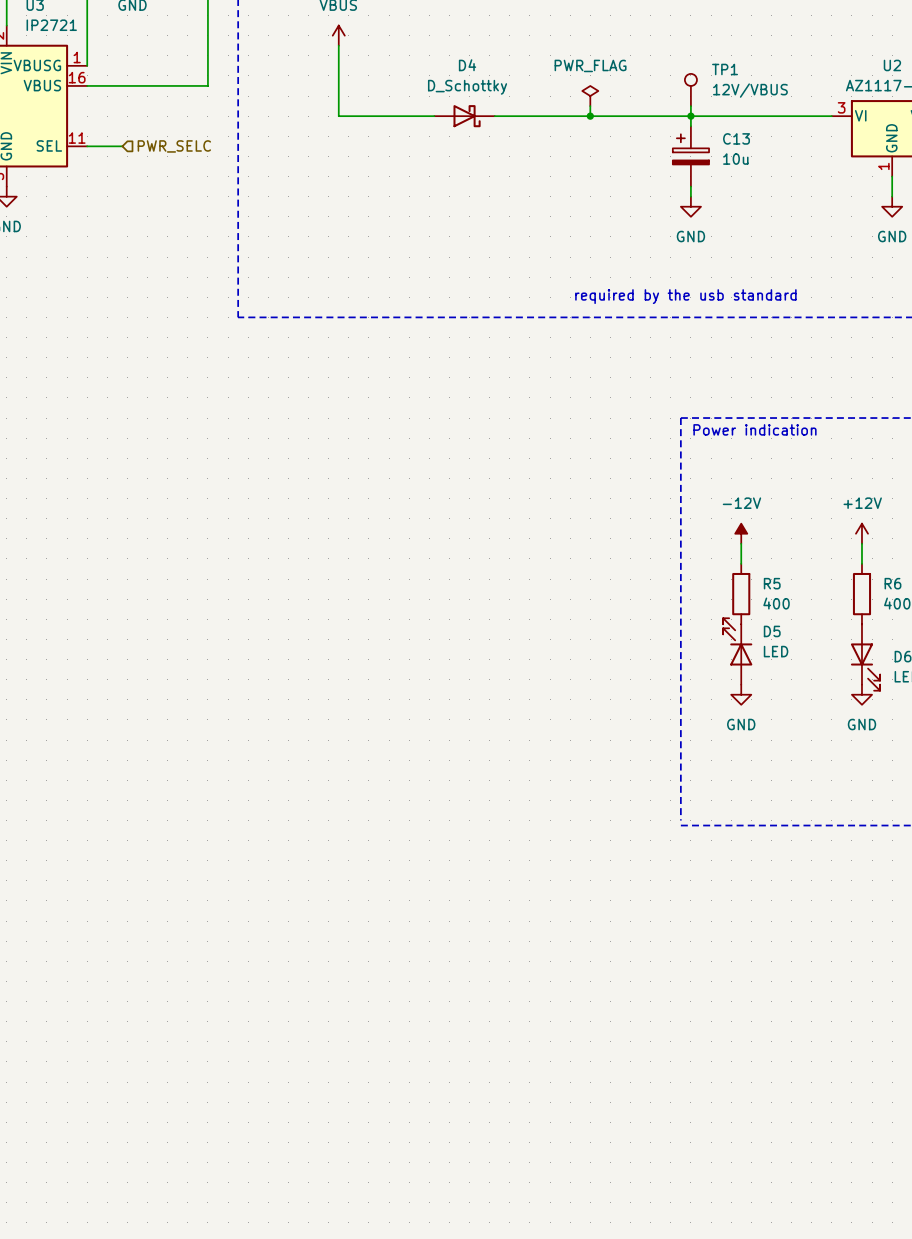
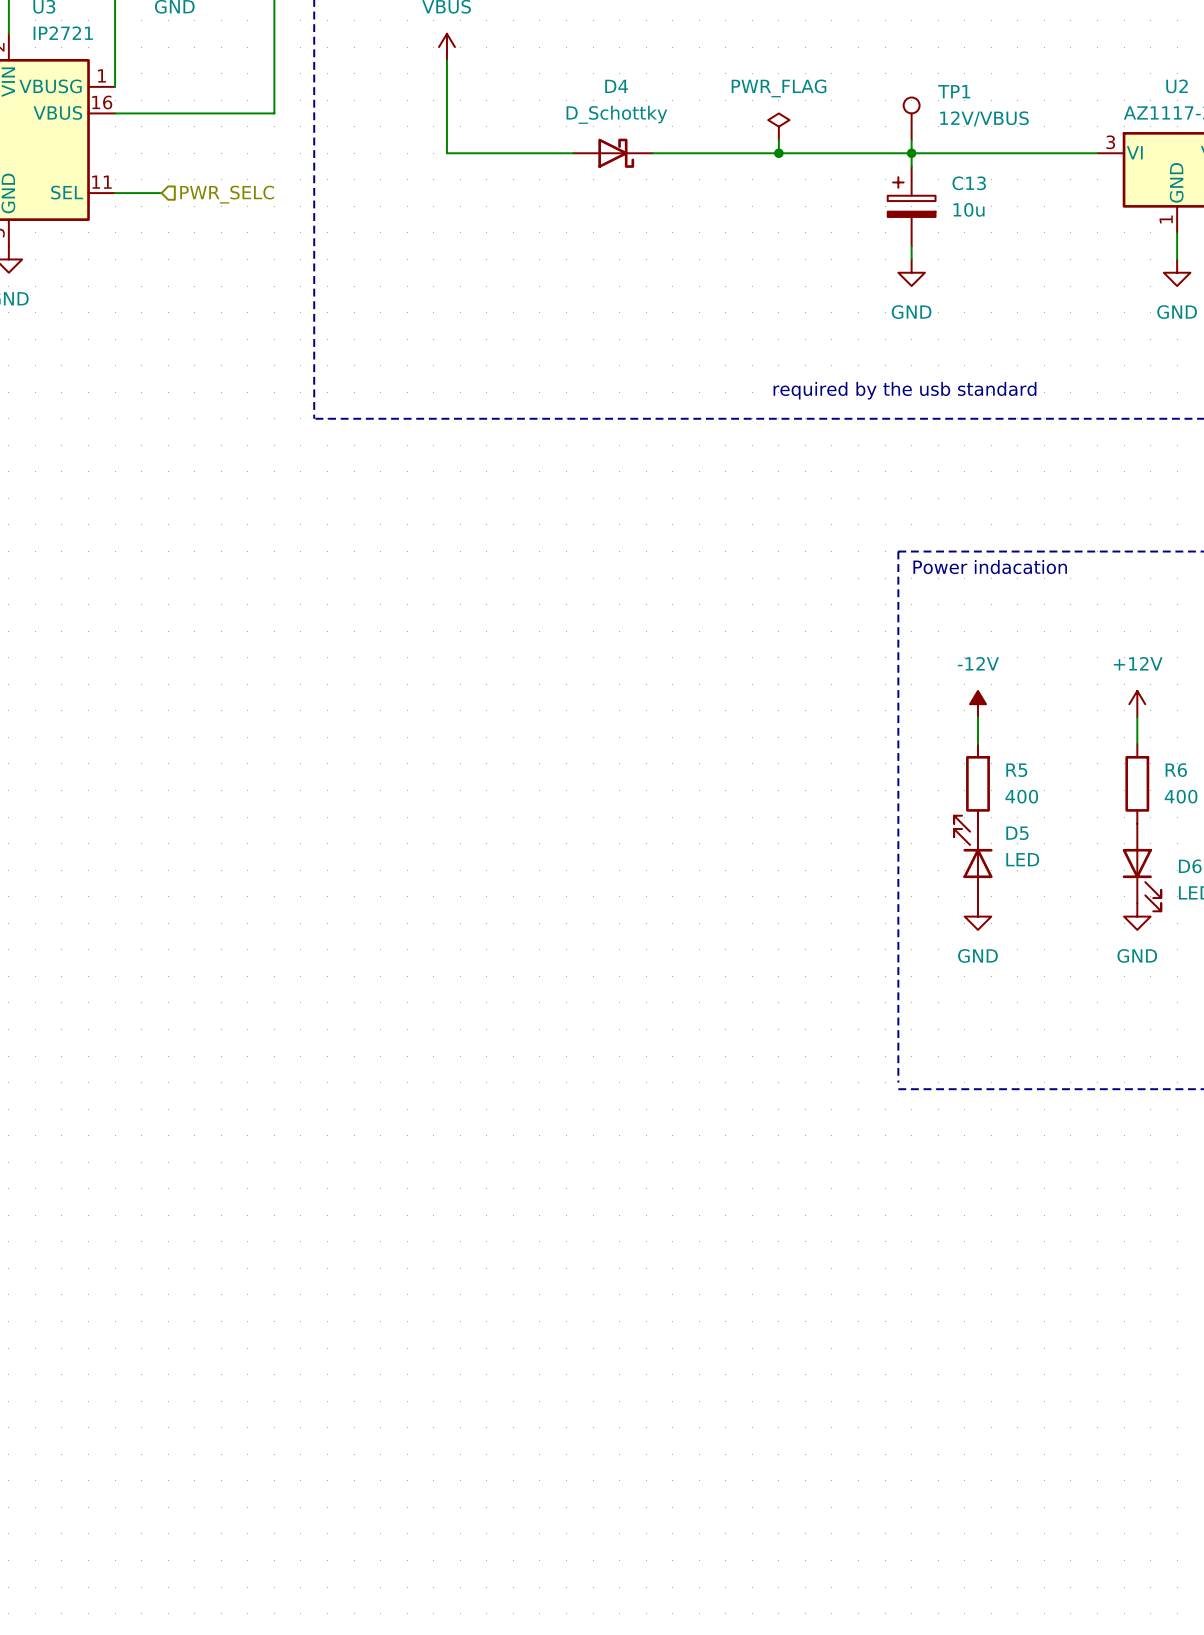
text: Power indication (754, 429) -> Power indacation (990, 567)

